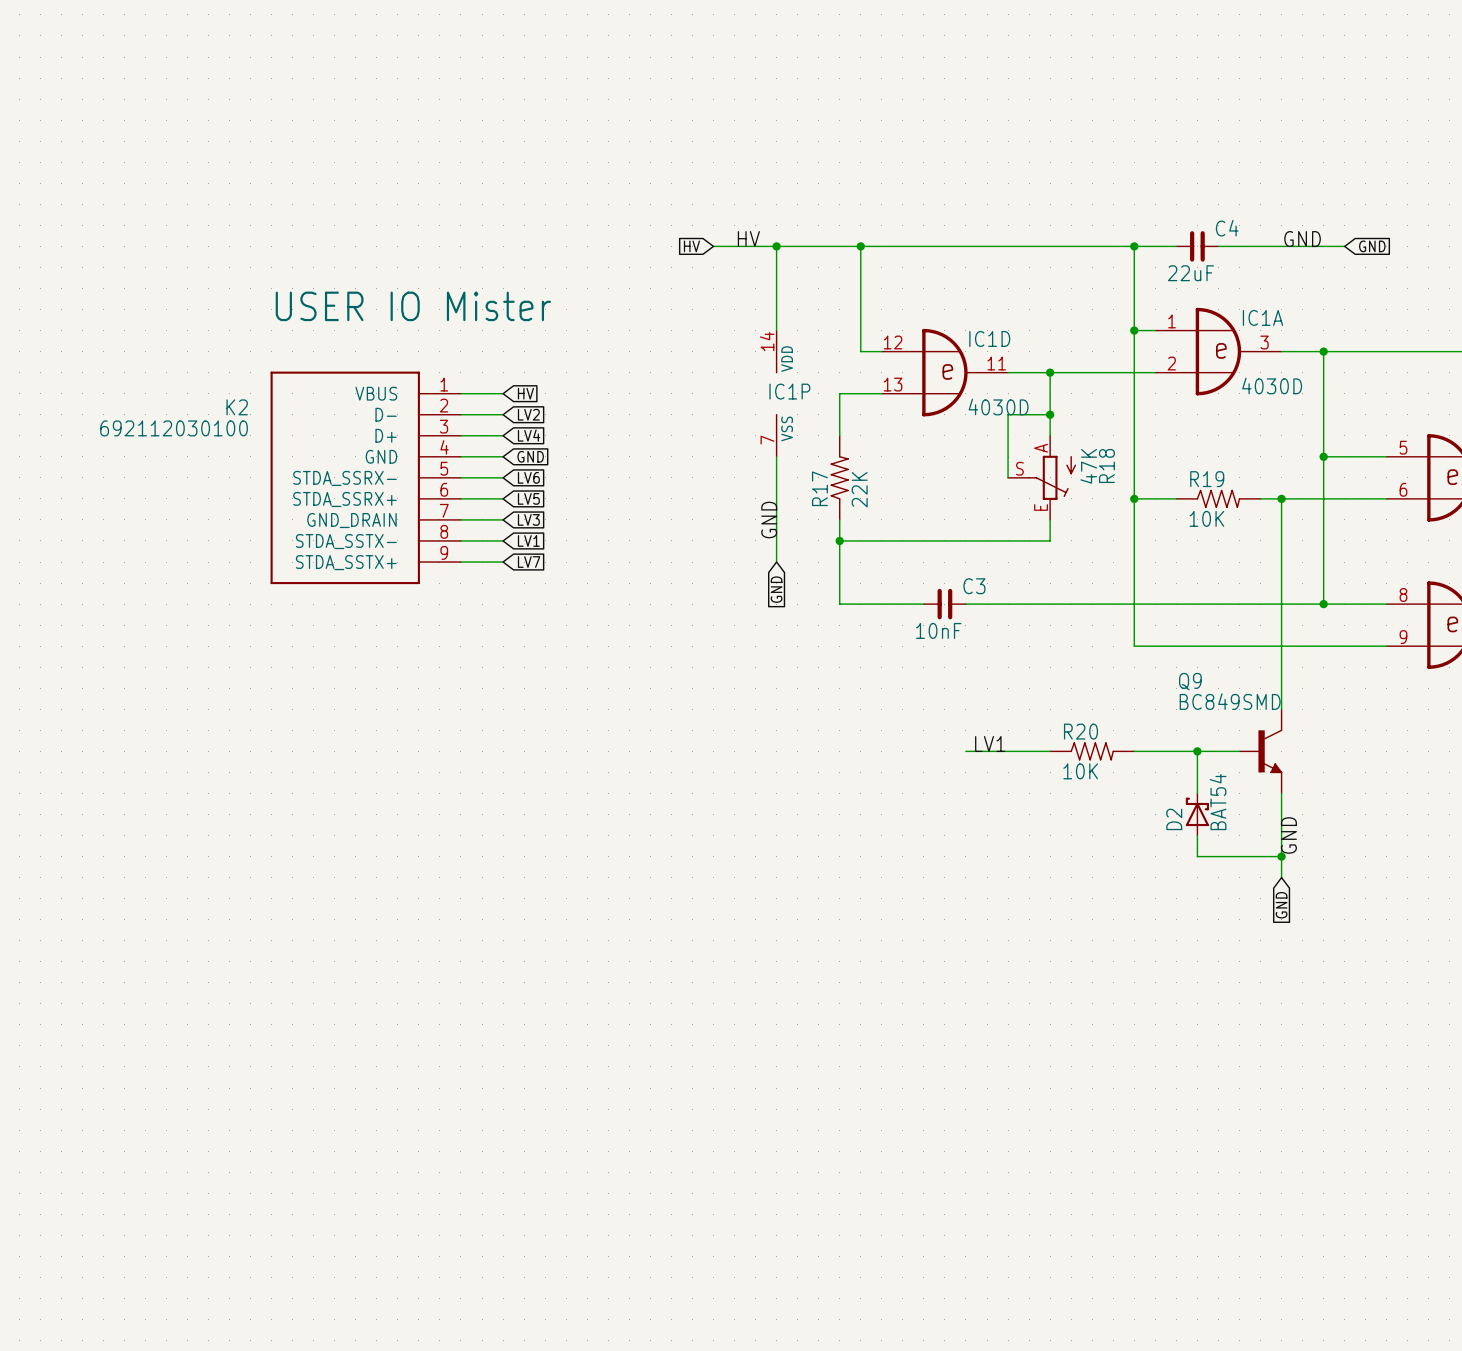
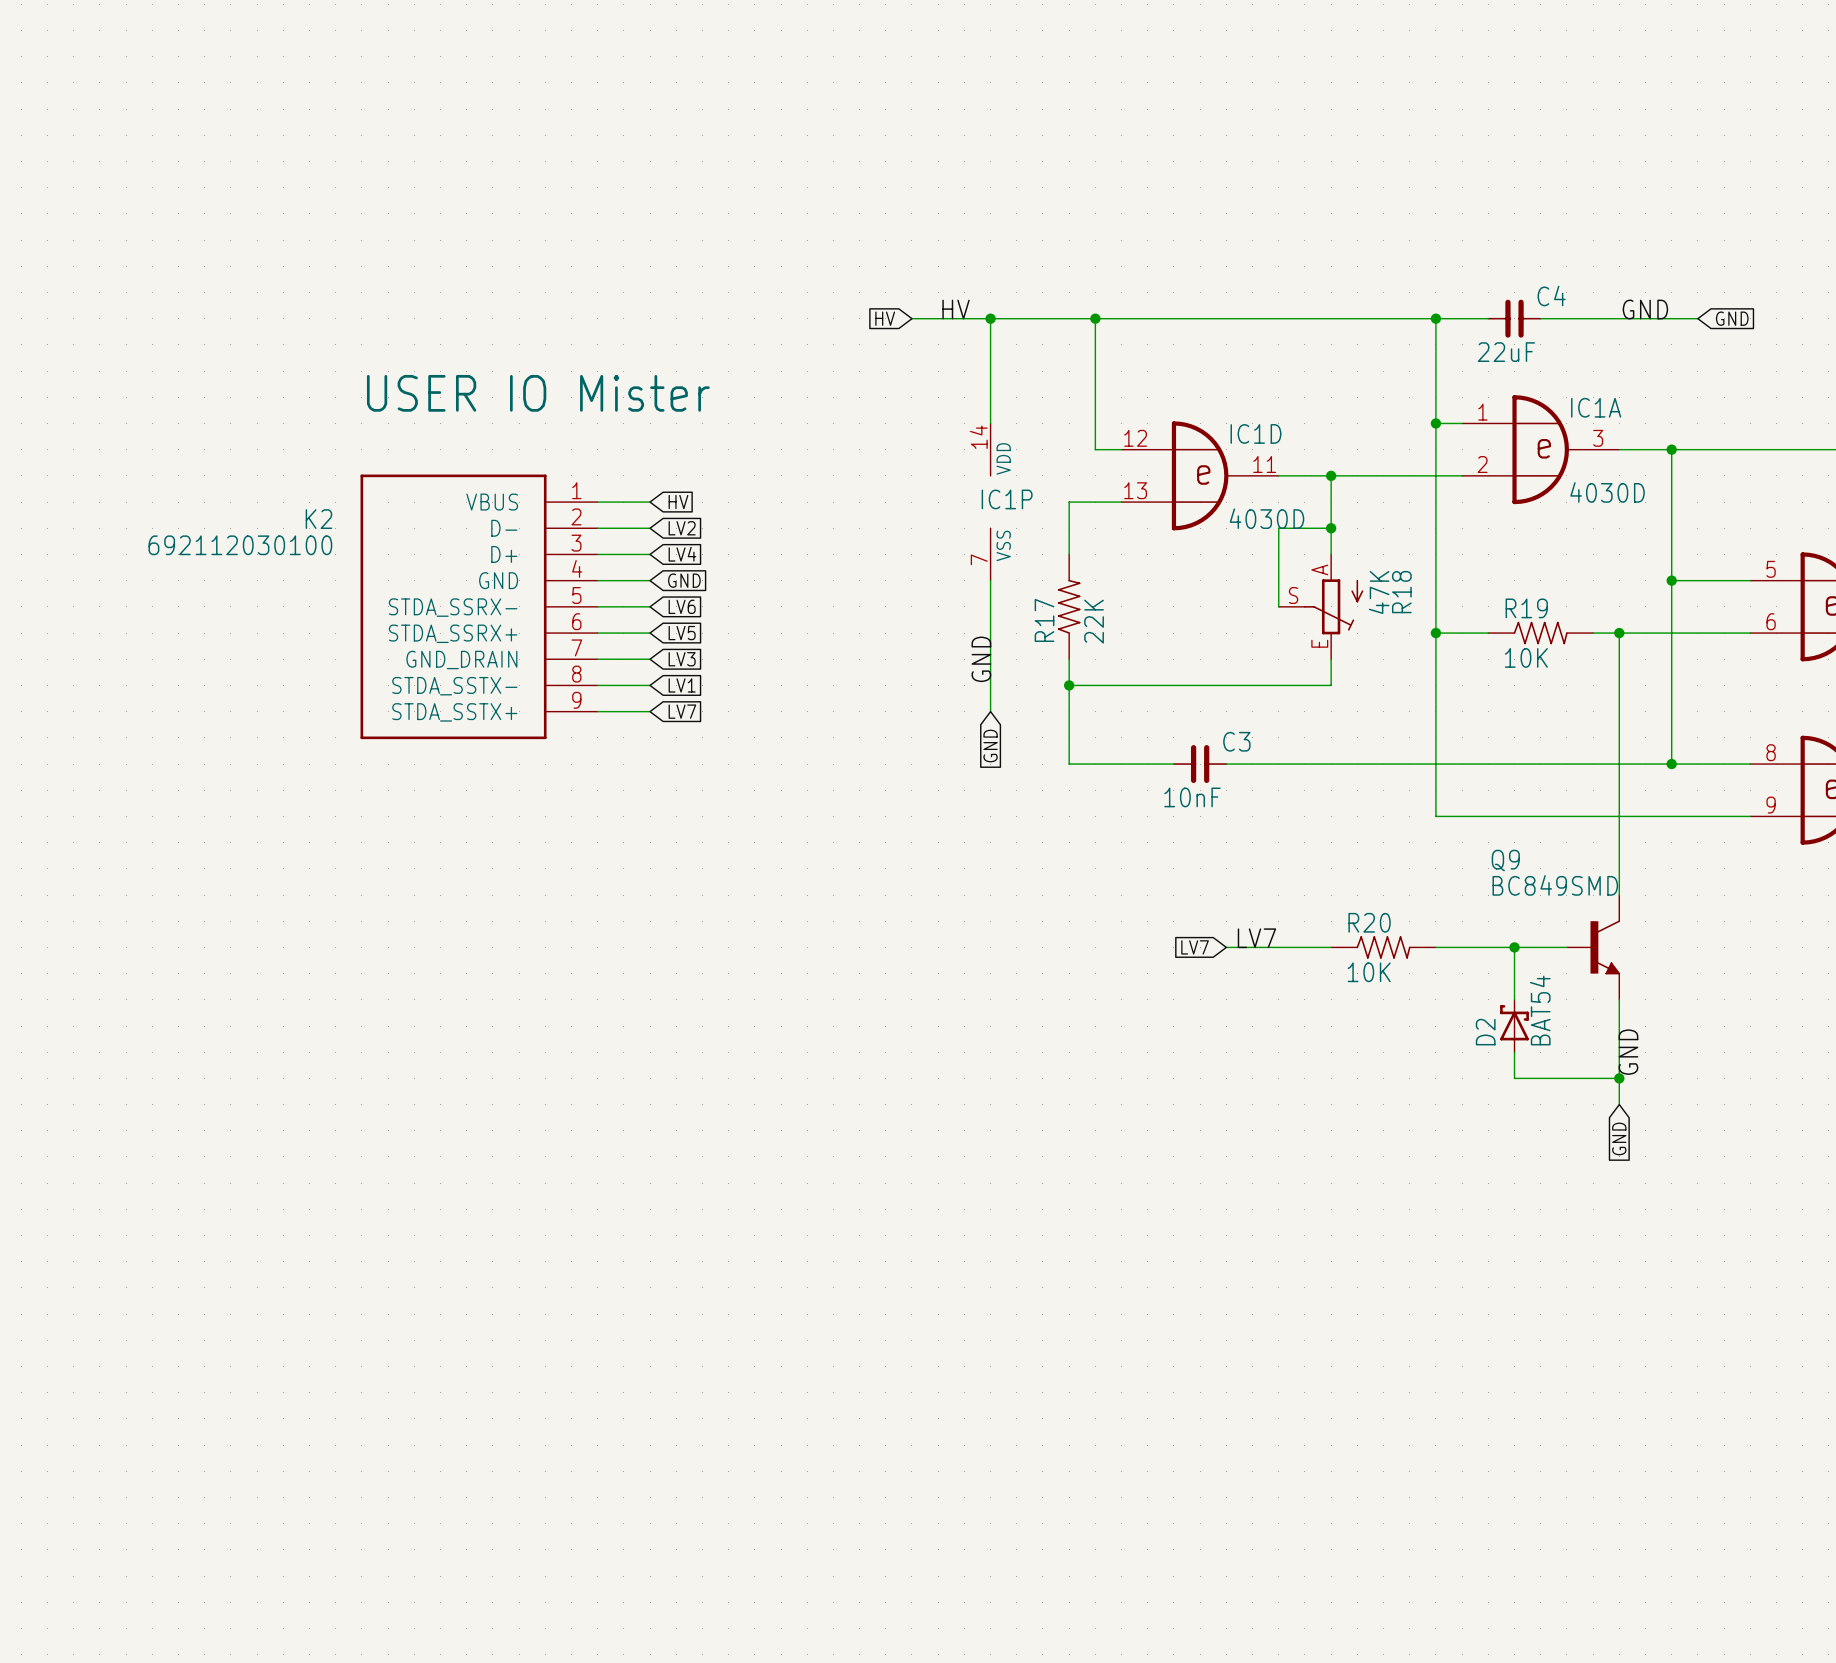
label: LV1 (990, 744) -> LV7 (1256, 938)
global label: none -> LV7 (1195, 947)

